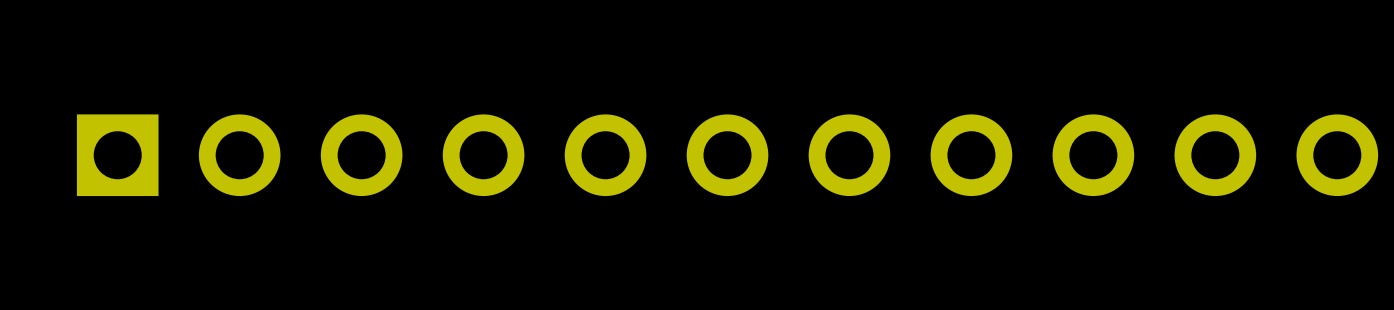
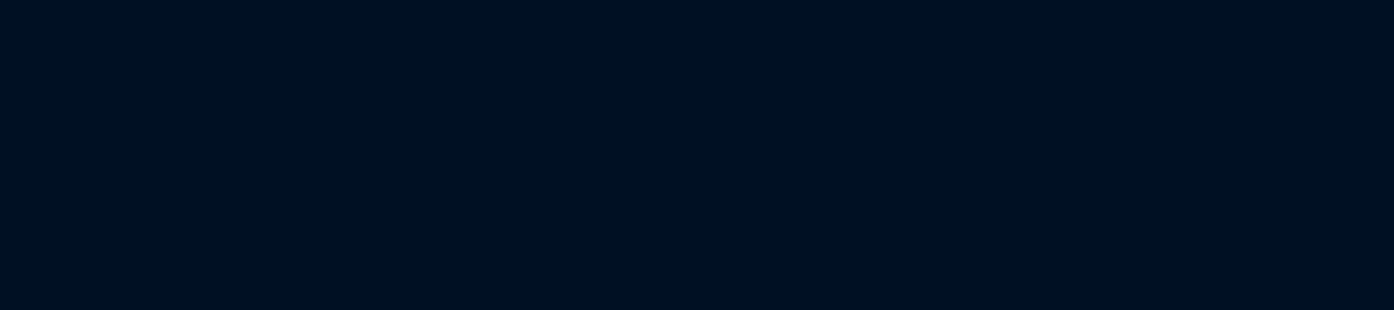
part: (727, 155) -> none

